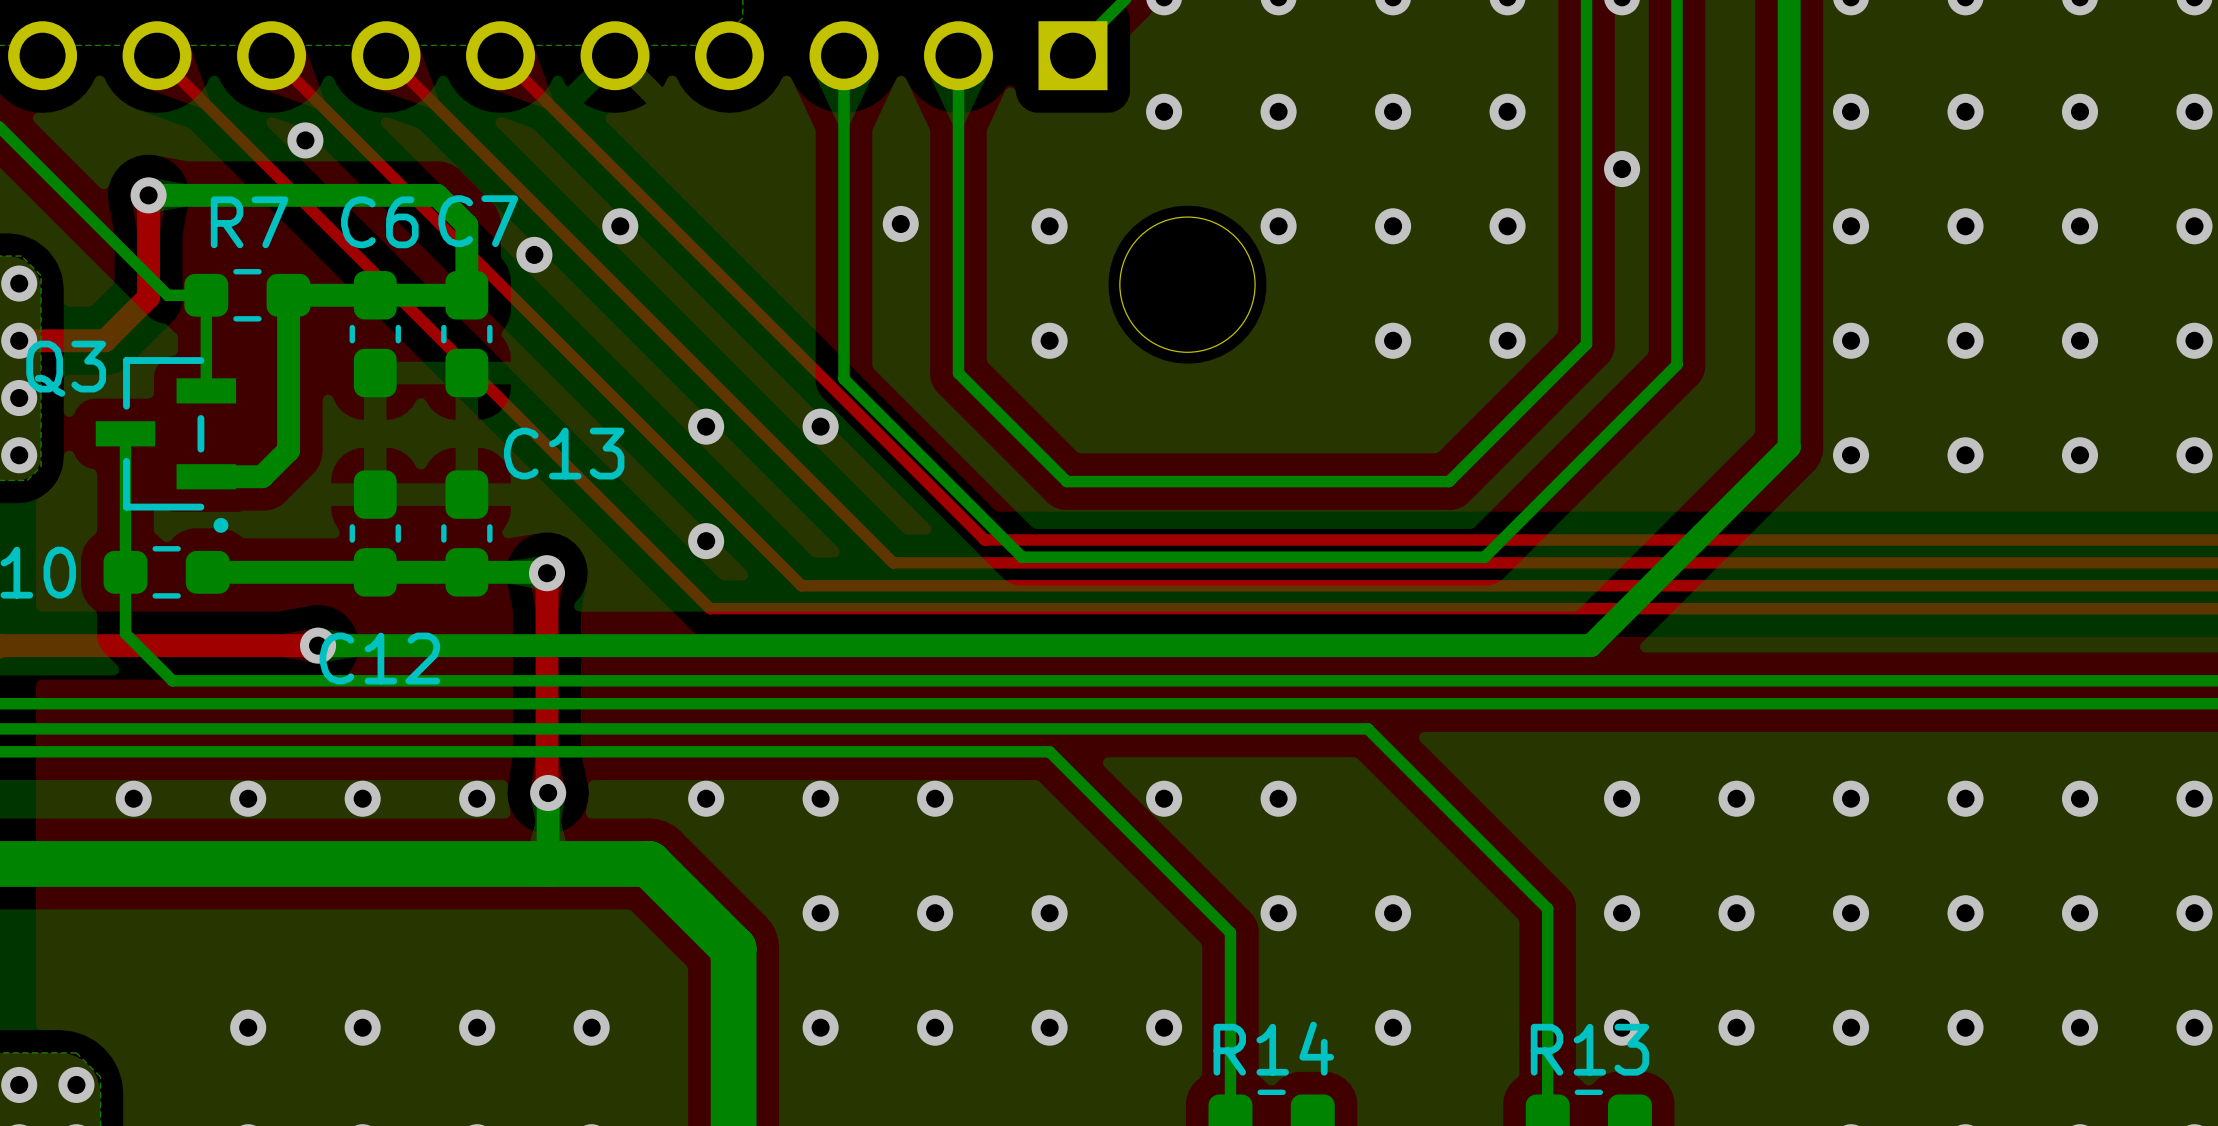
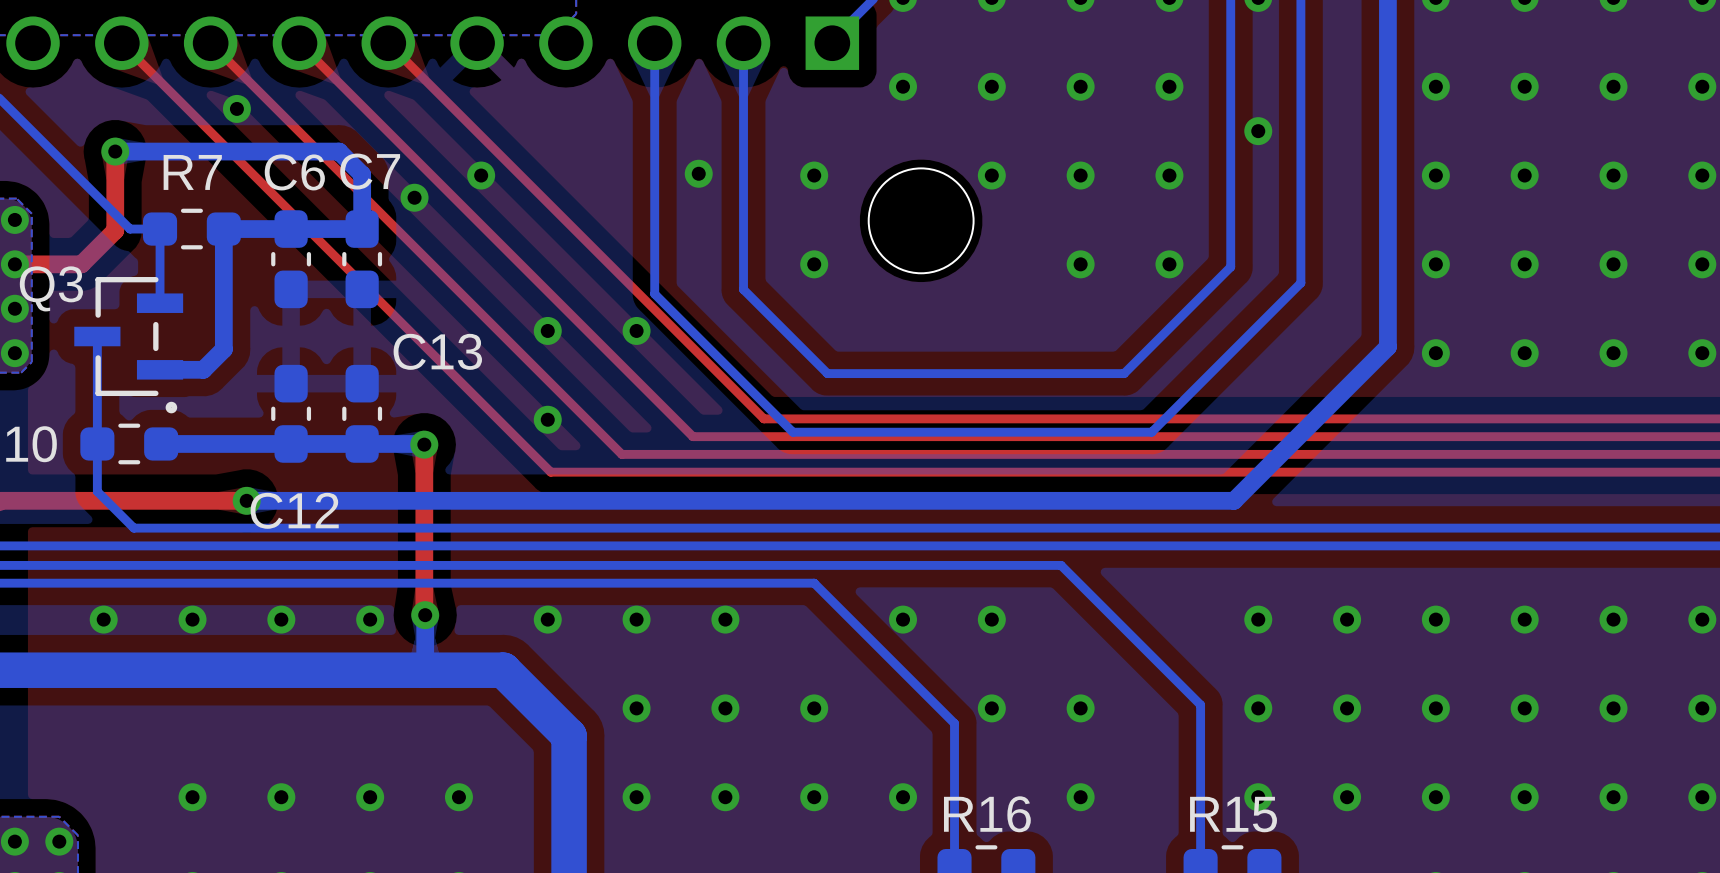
R14 name: R14 (1273, 1048) -> R16 (987, 814)
R13 name: R13 (1589, 1049) -> R15 (1233, 814)

